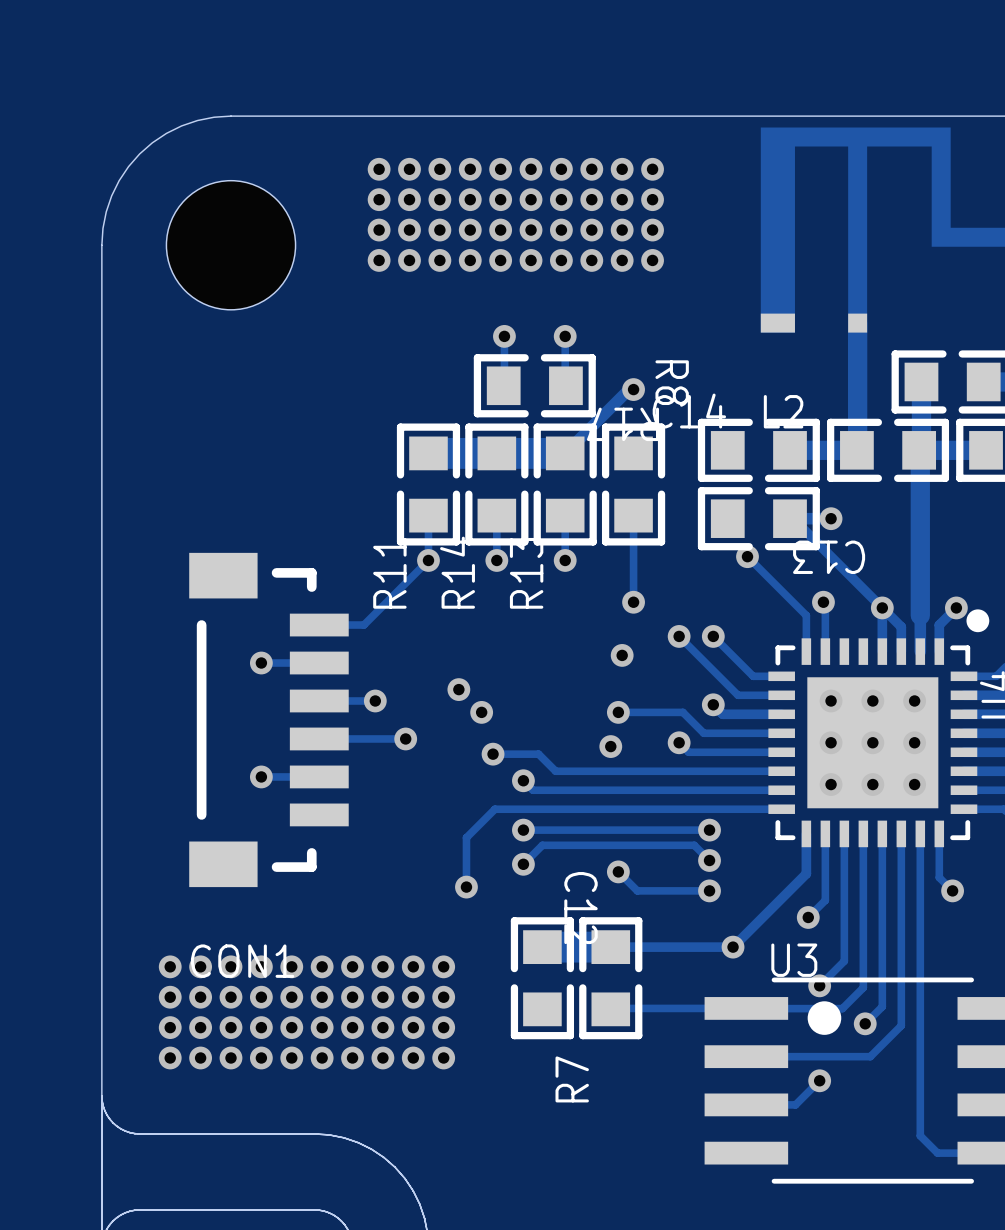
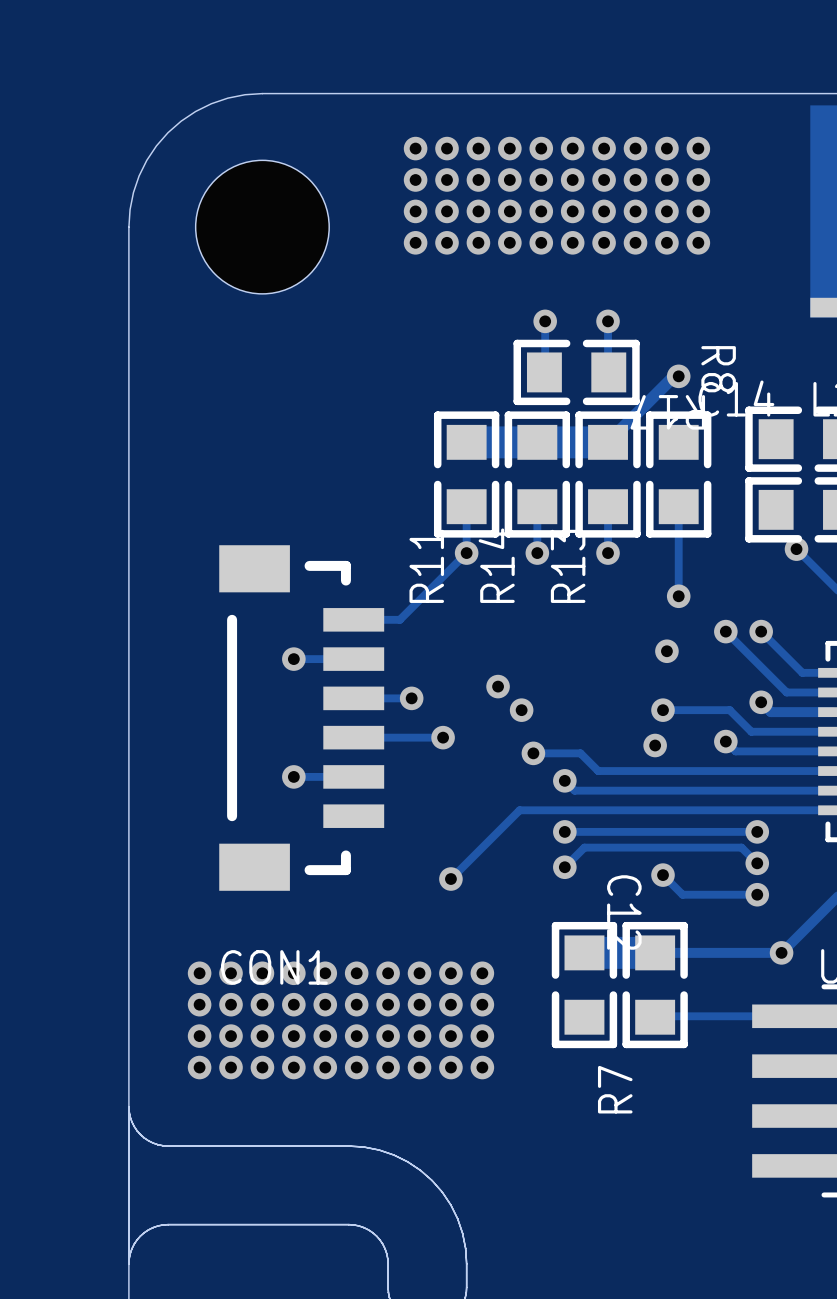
track: (494, 809) (466, 837) (466, 887) -> (535, 810) (519, 810) (450, 879)
via position: (466, 887) -> (450, 879)

